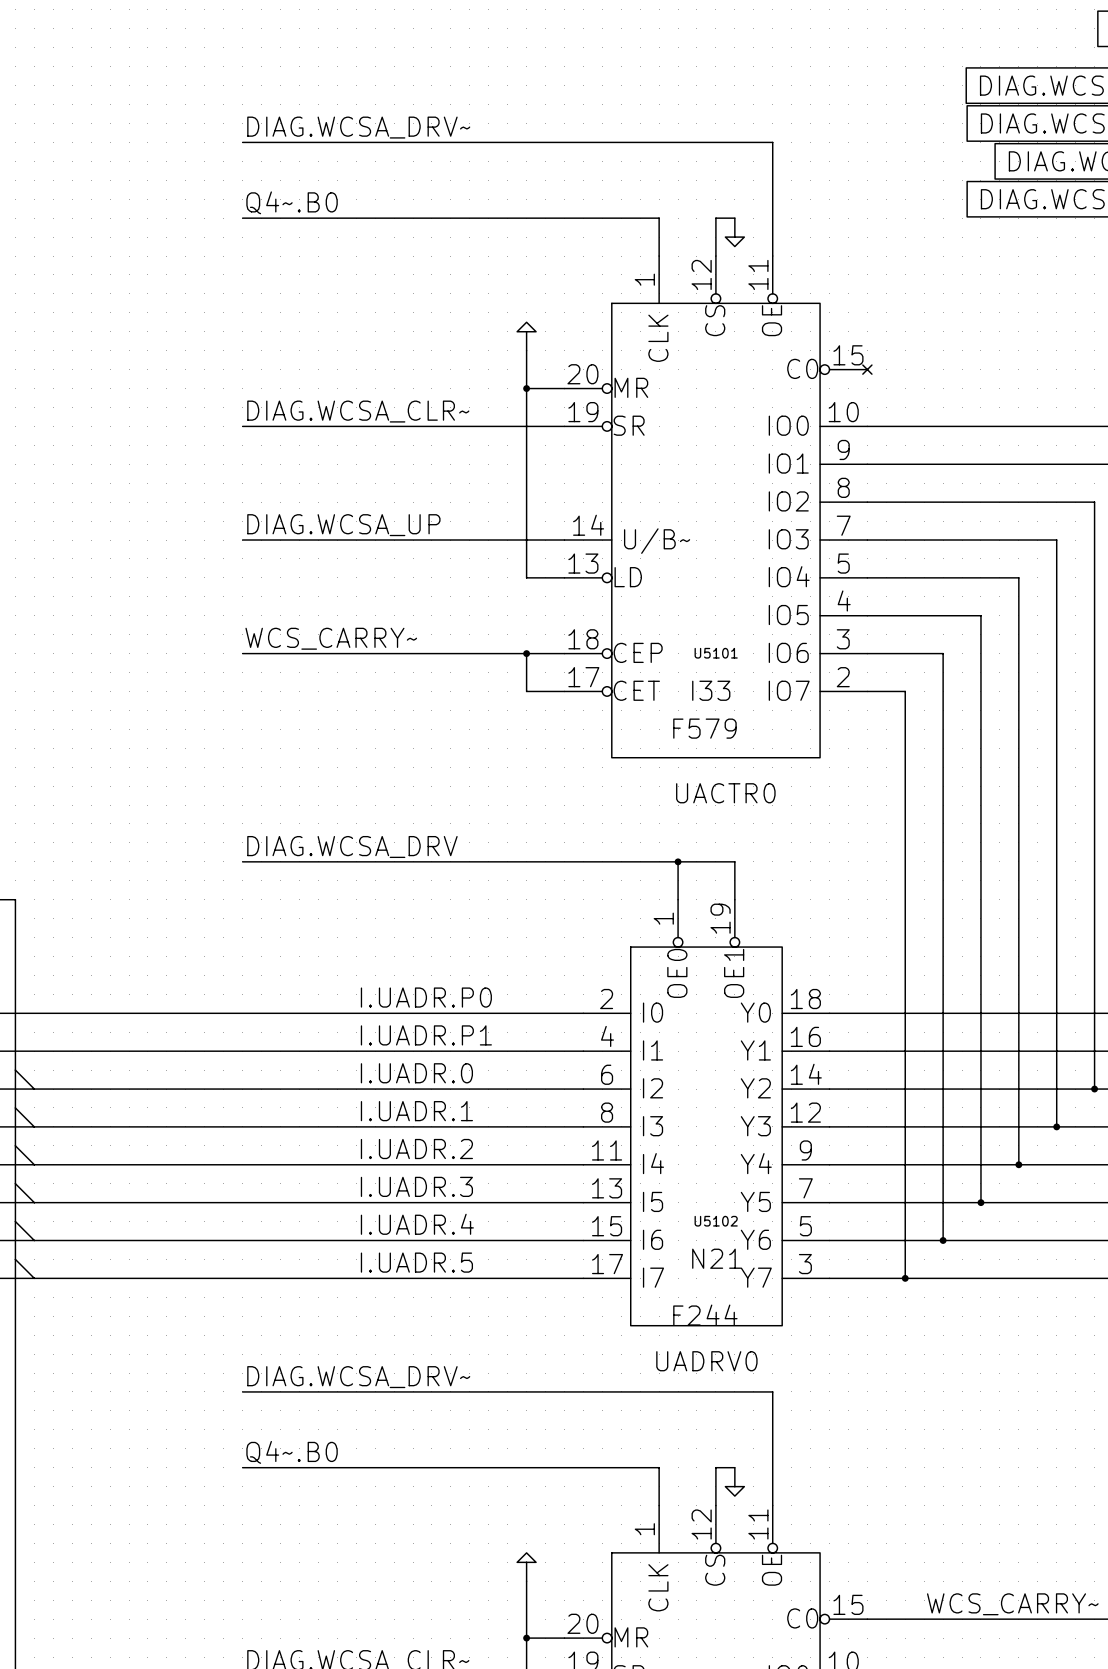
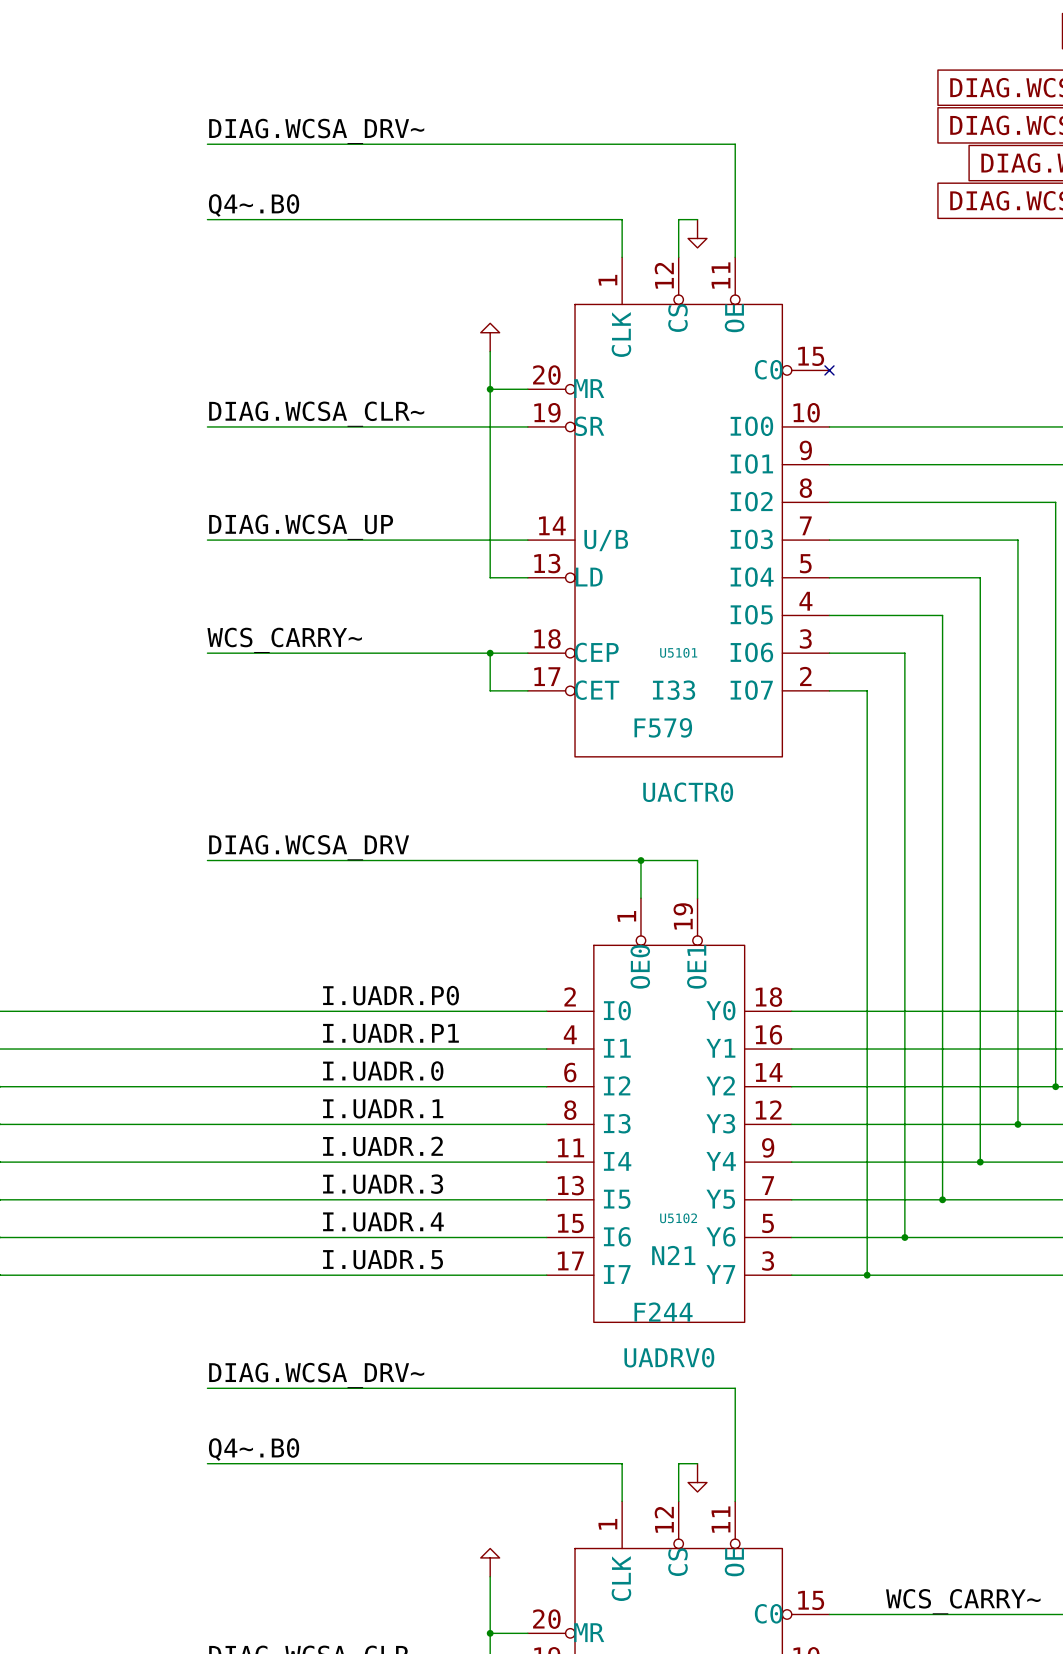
U5101 pin name: U/B~ (657, 541) -> U/B (606, 540)

